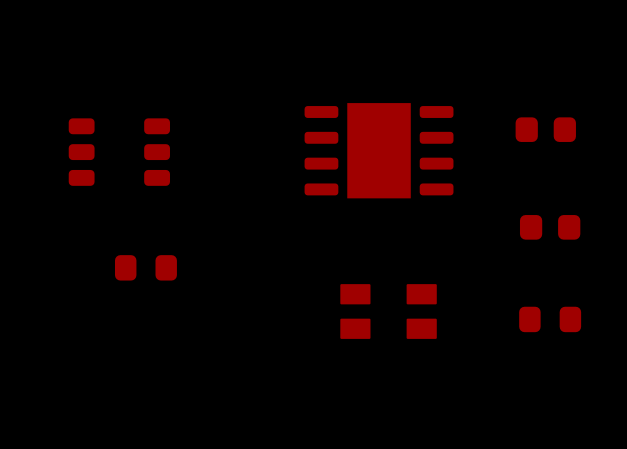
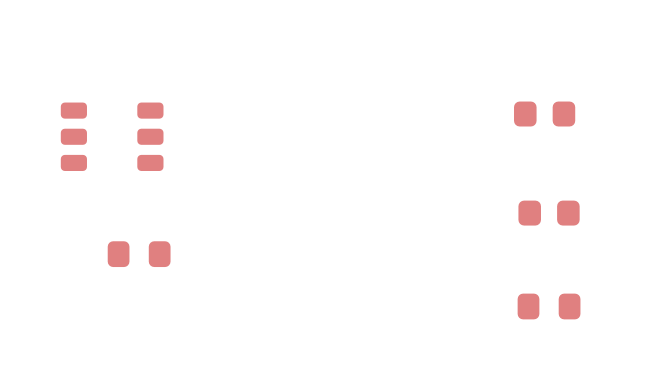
part: (379, 150) -> none
part: (388, 311) -> none

